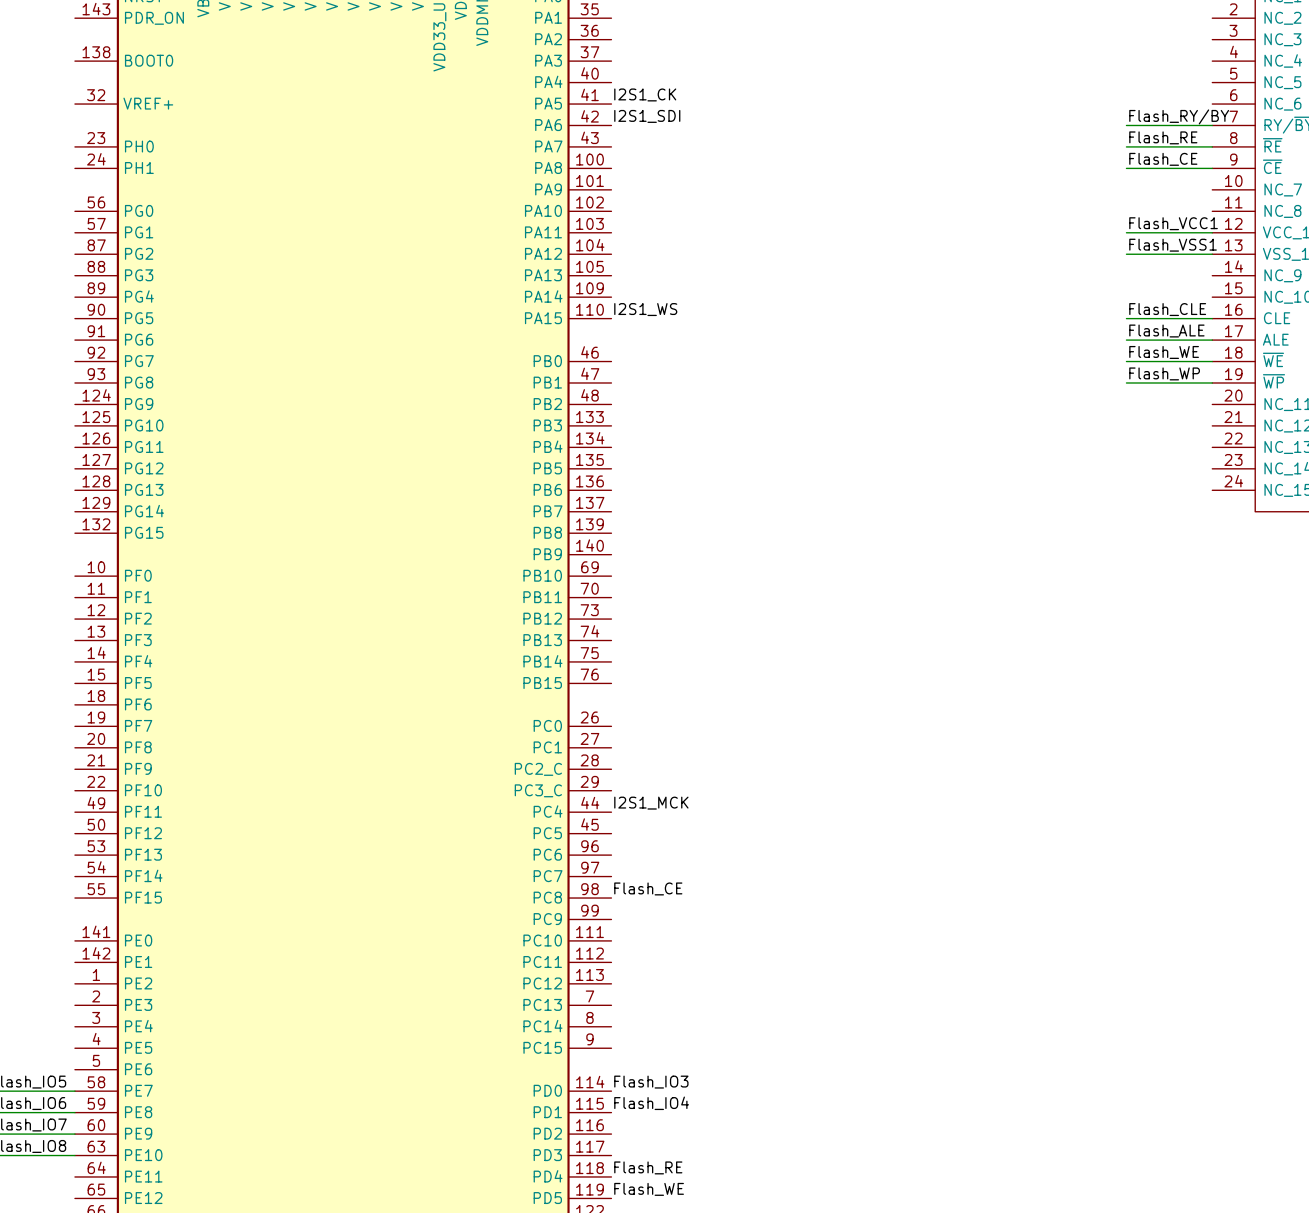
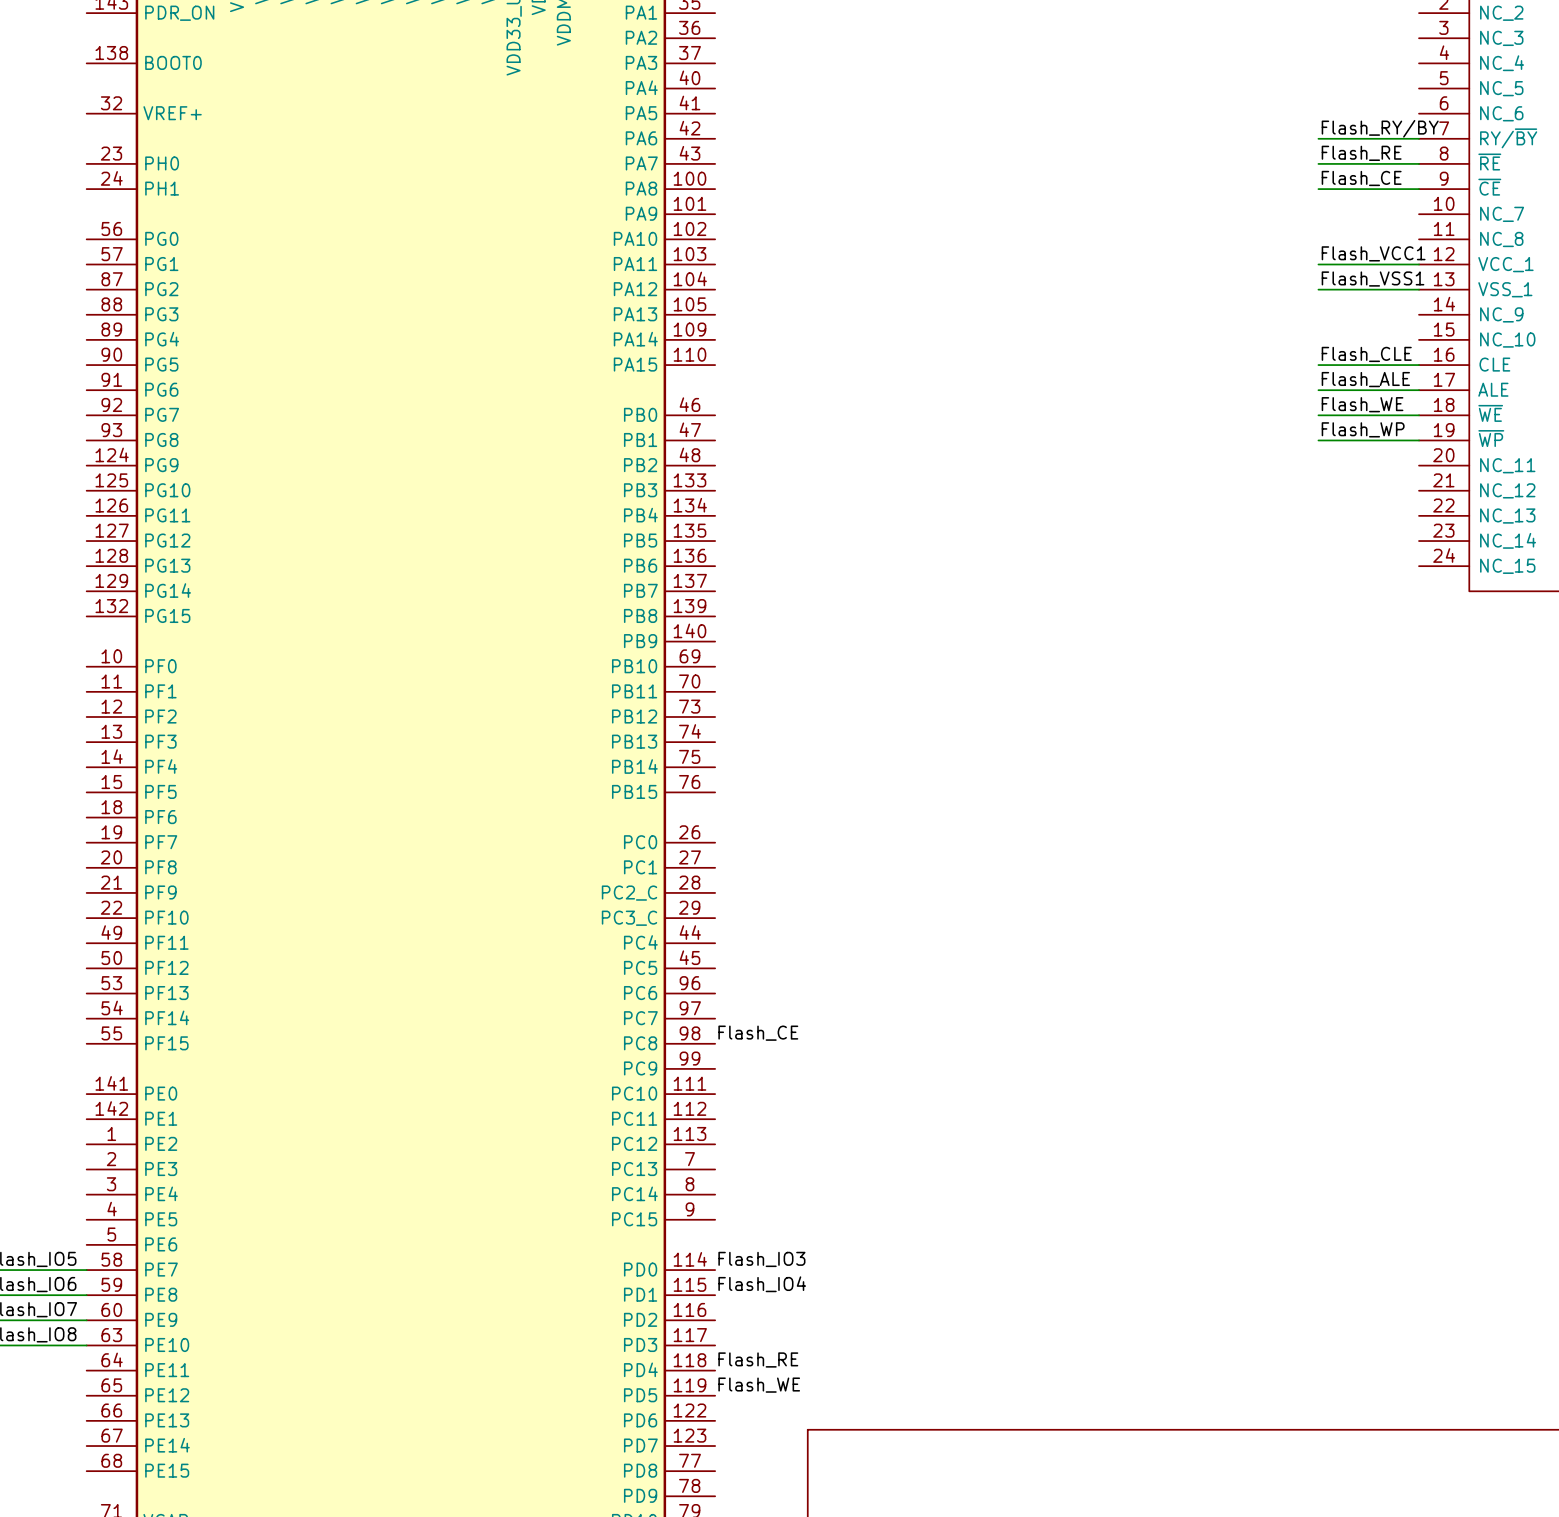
label: I2S1_CK (645, 94) -> none
label: I2S1_SDI (647, 116) -> none
label: I2S1_WS (645, 309) -> none
label: I2S1_MCK (651, 803) -> none

